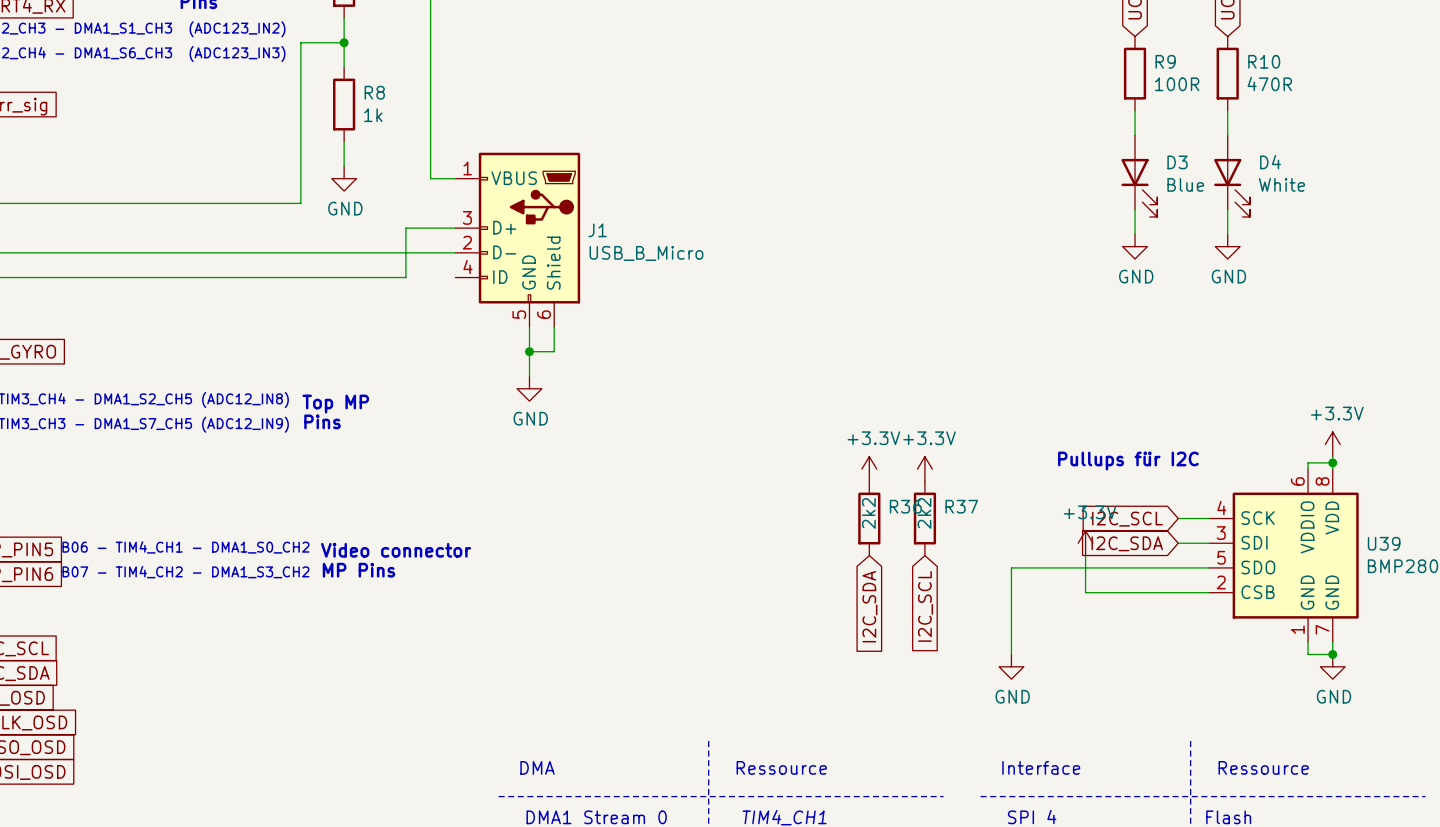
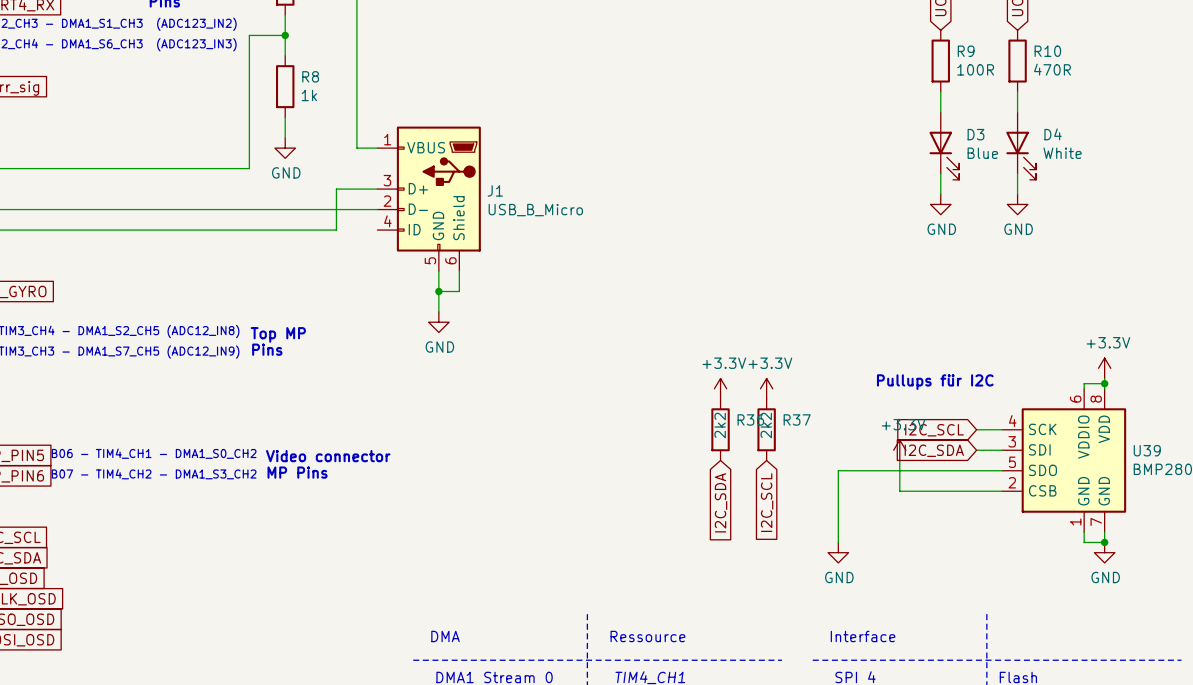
text: Ressource (1263, 767) -> none

